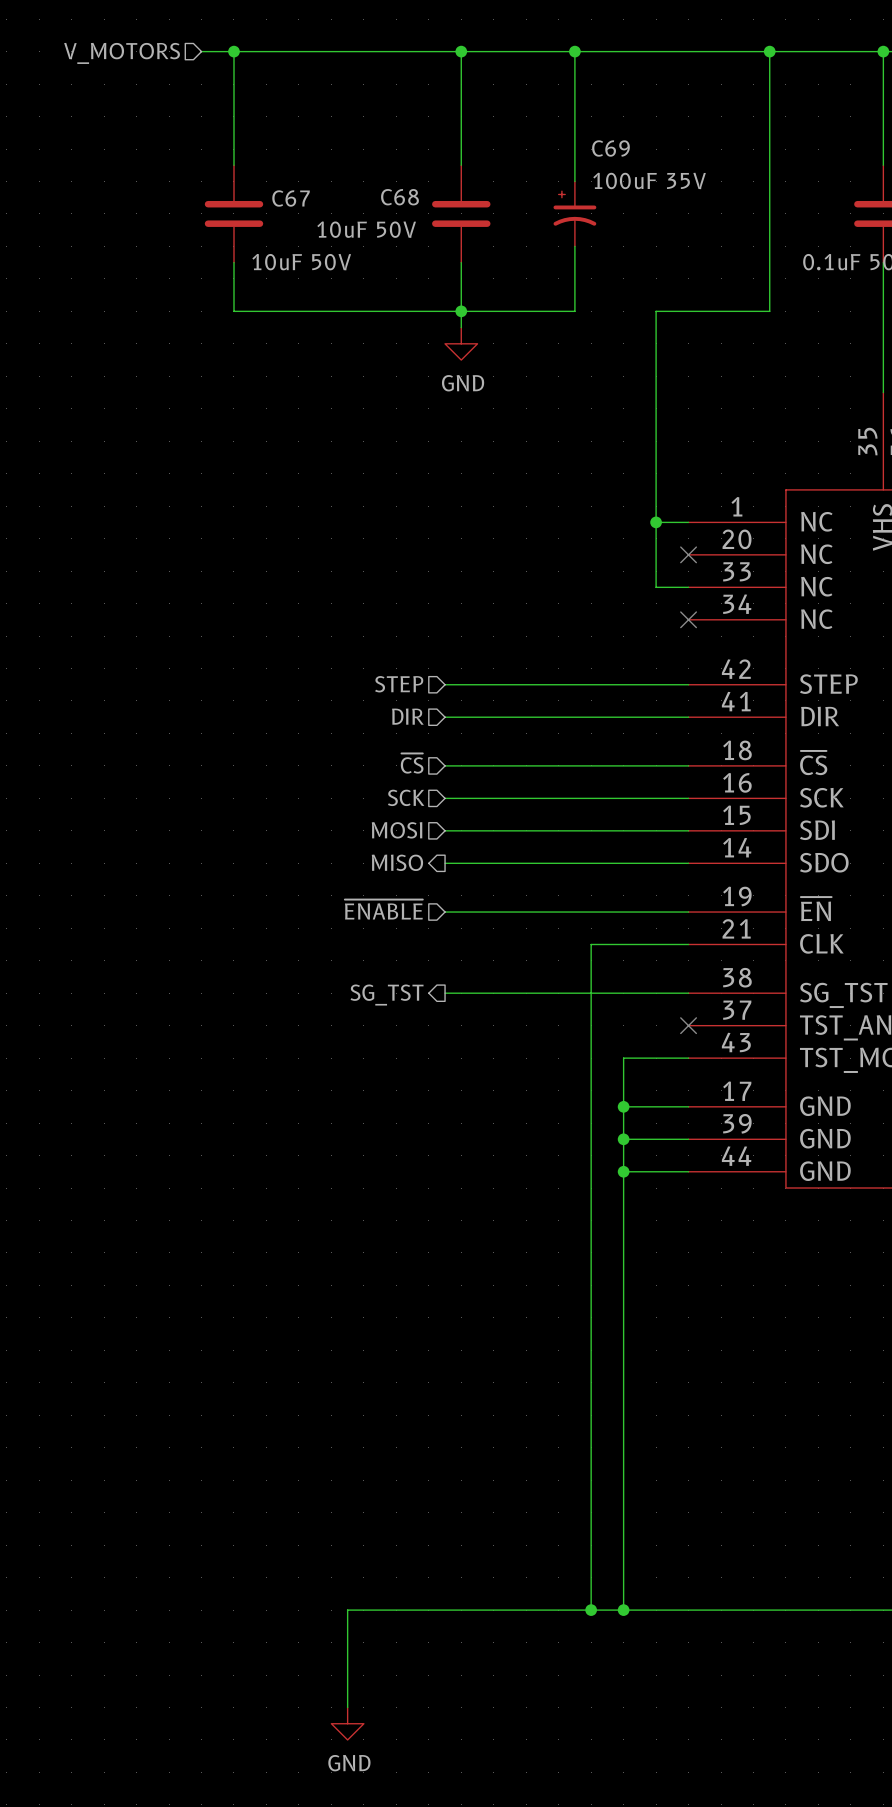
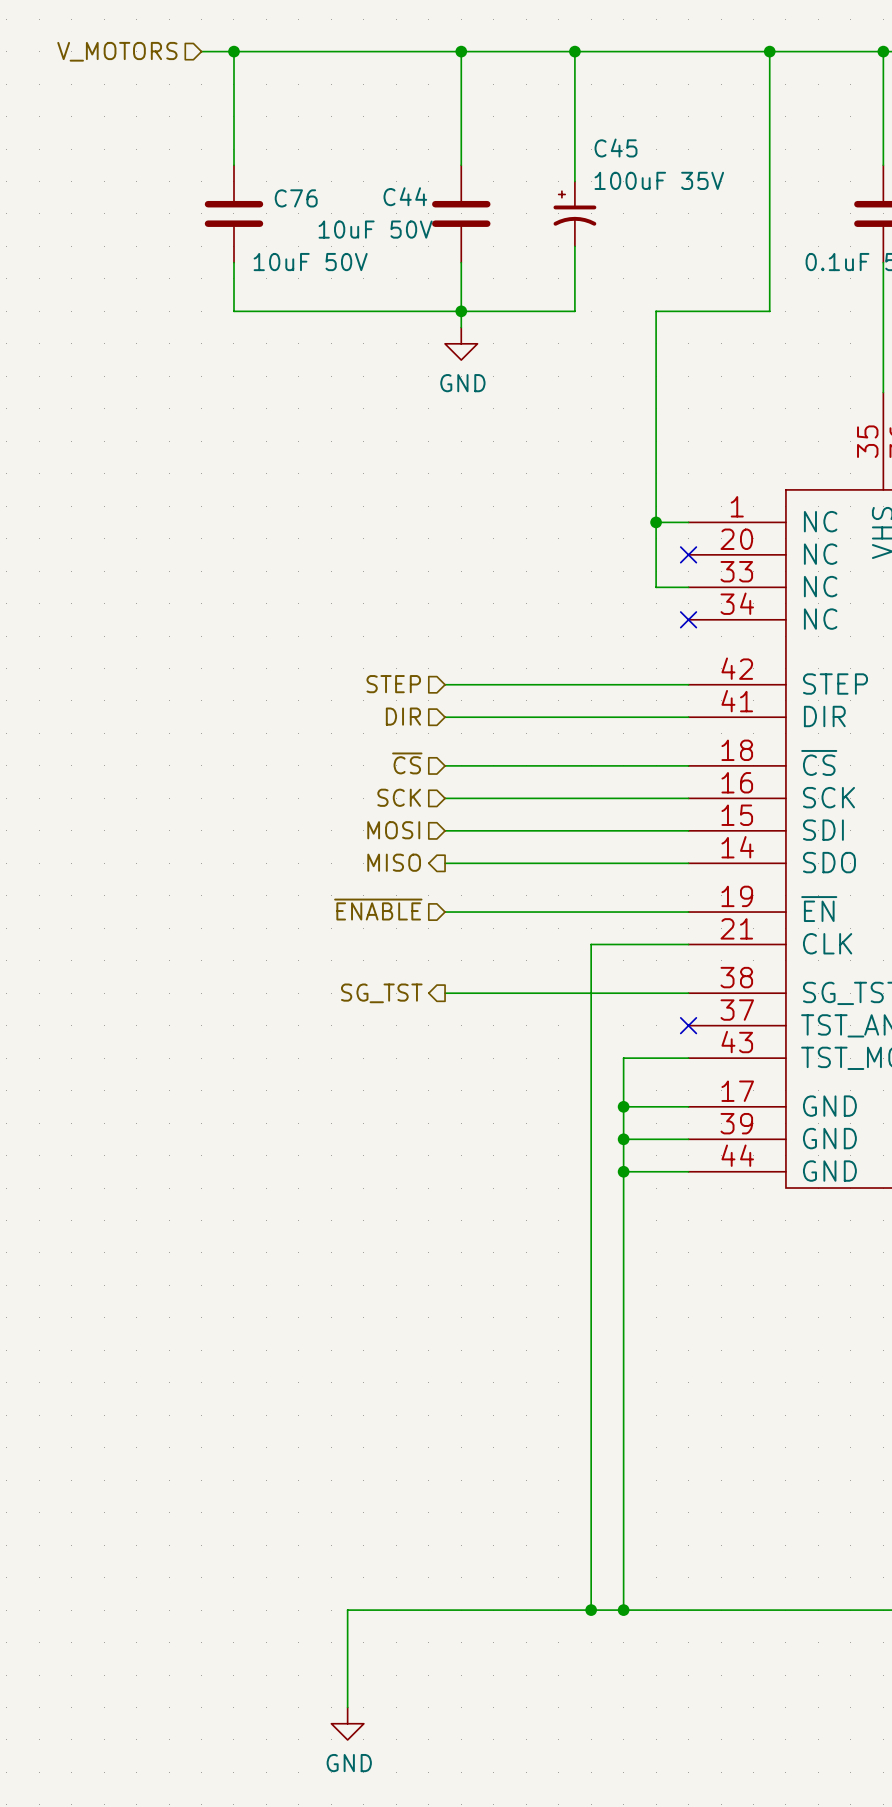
C69 name: C69 (610, 148) -> C45 (616, 148)
C68 name: C68 (399, 197) -> C44 (405, 196)
C67 name: C67 (291, 198) -> C76 (296, 198)

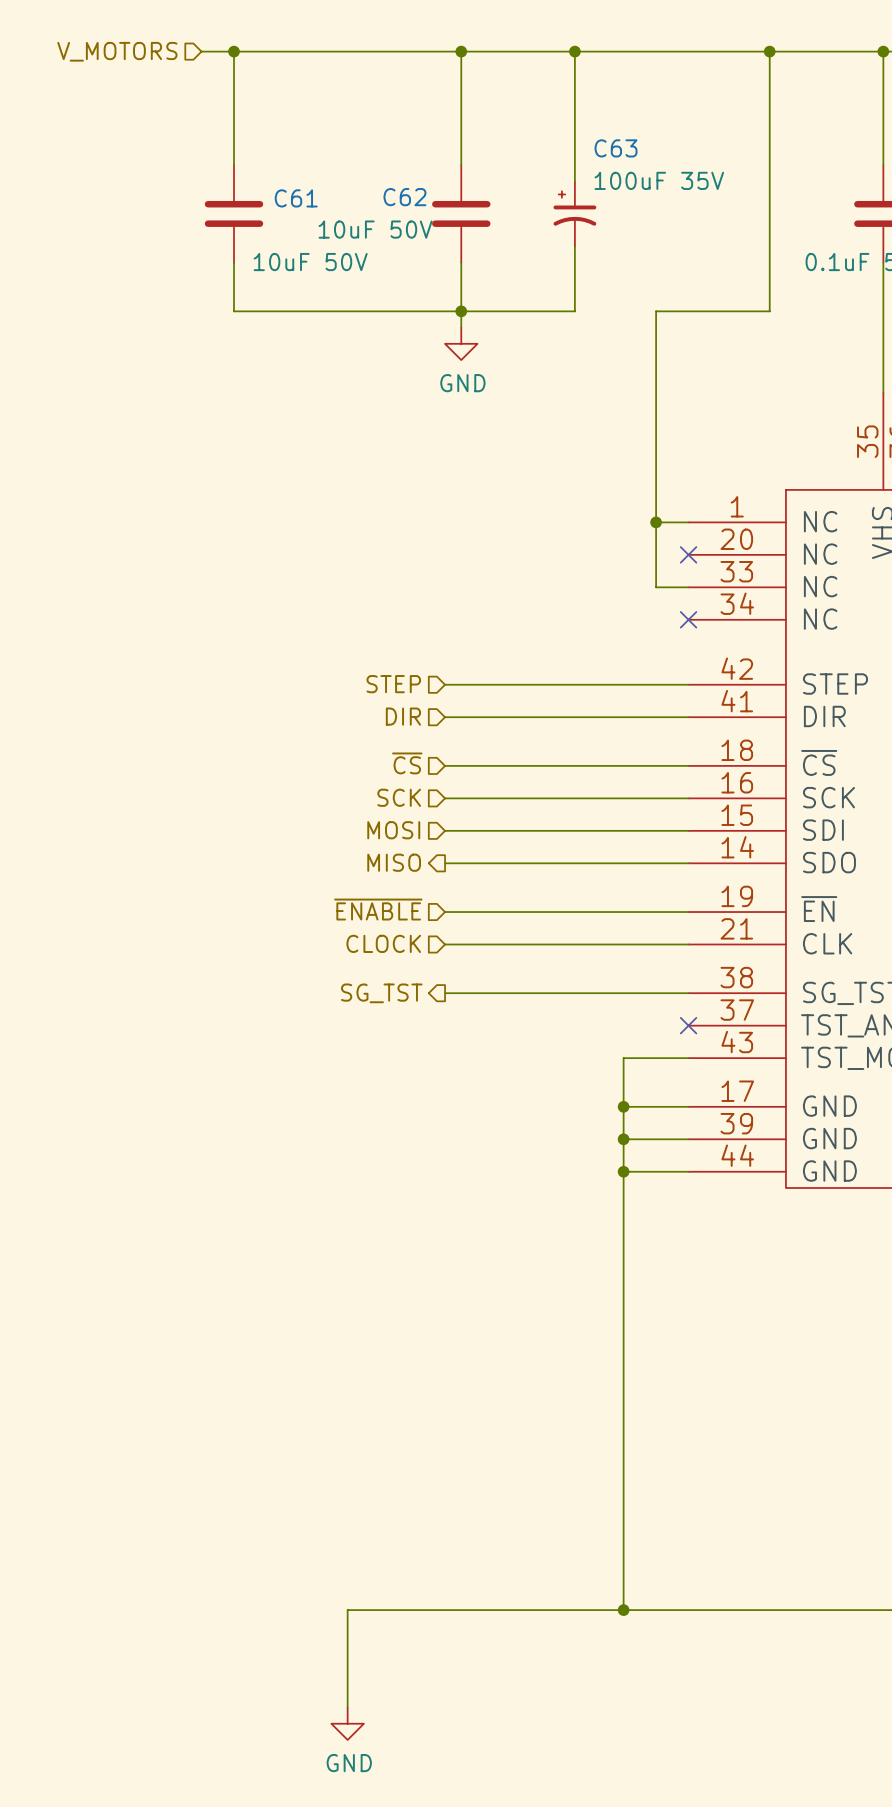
C45 name: C45 (616, 148) -> C63 (616, 148)
C44 name: C44 (405, 196) -> C62 (404, 197)
C76 name: C76 (296, 198) -> C61 (296, 198)
hierarchical label: none -> CLOCK (383, 943)
wire: (591, 944) (591, 1610) -> (591, 944) (445, 944)
junction: (591, 1610) -> none

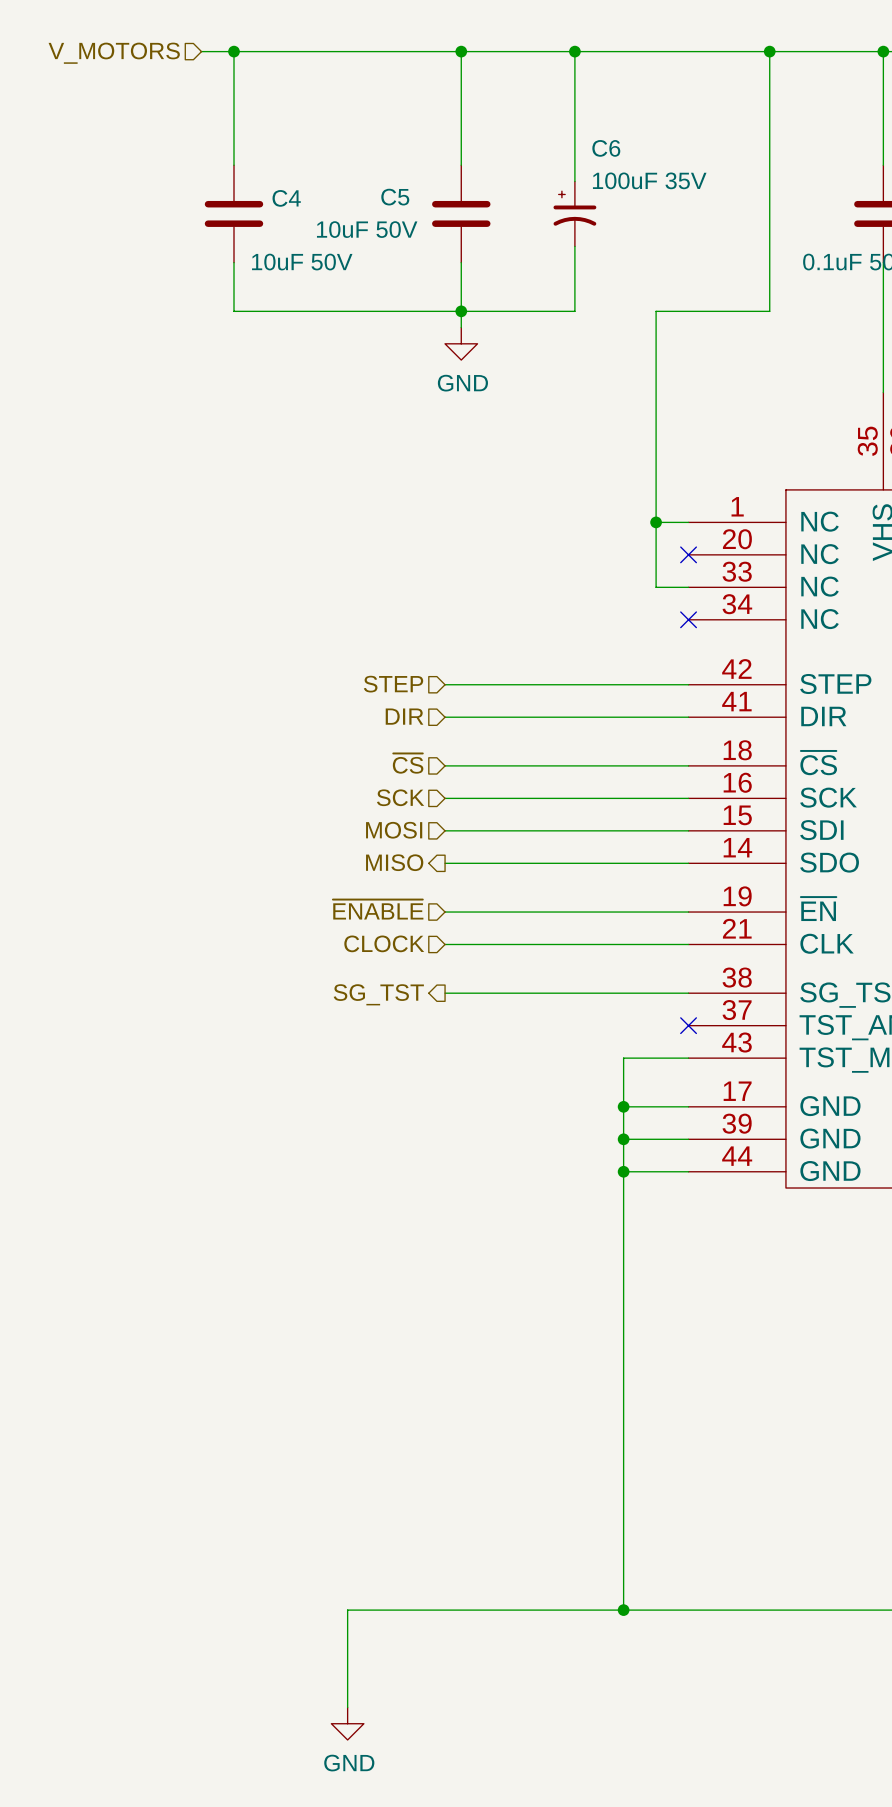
C63 name: C63 (616, 148) -> C6 (606, 148)
C62 name: C62 (404, 197) -> C5 (395, 197)
C61 name: C61 (296, 198) -> C4 (286, 198)

